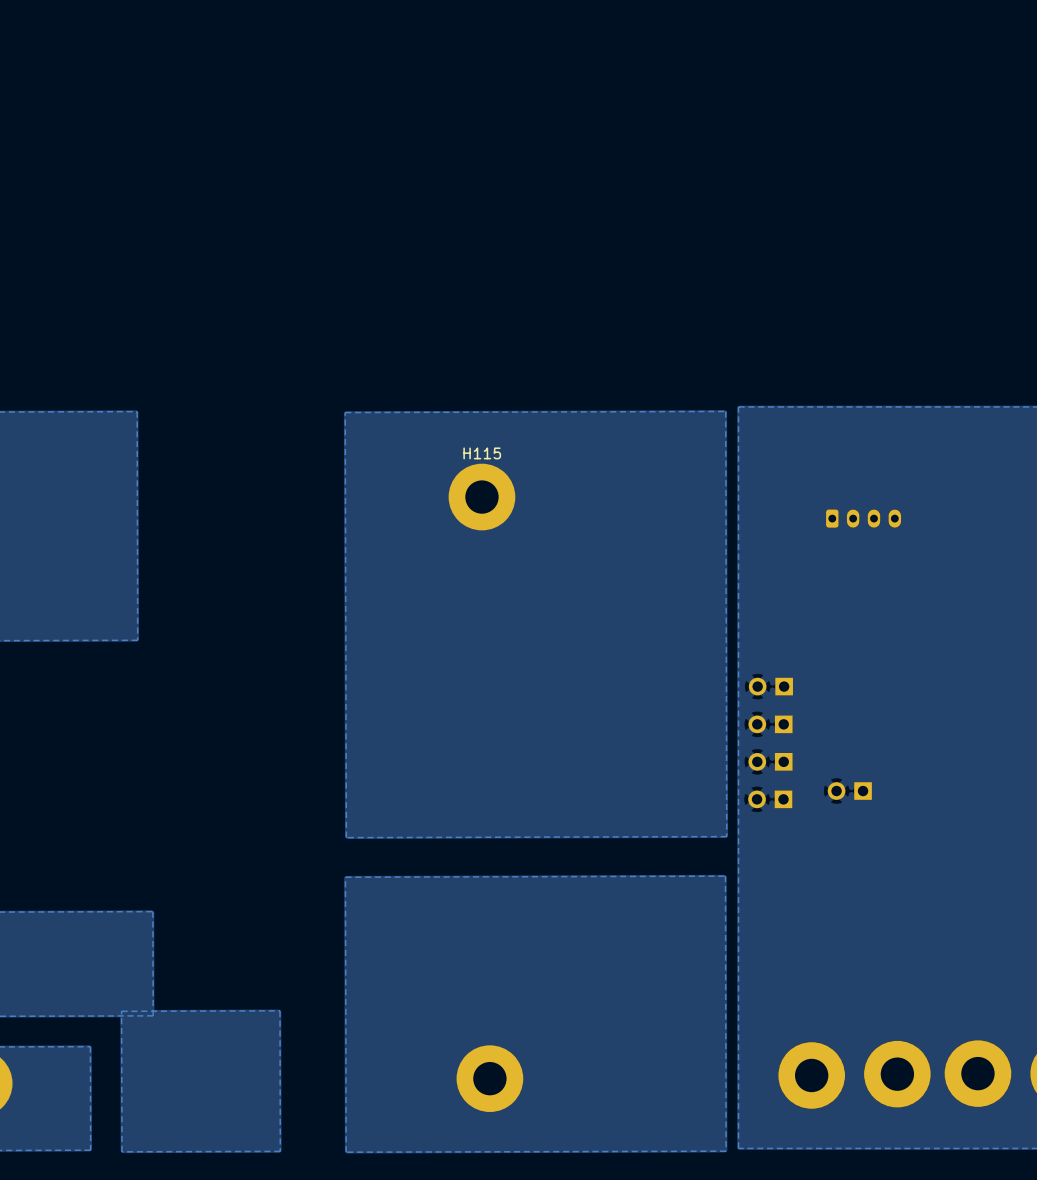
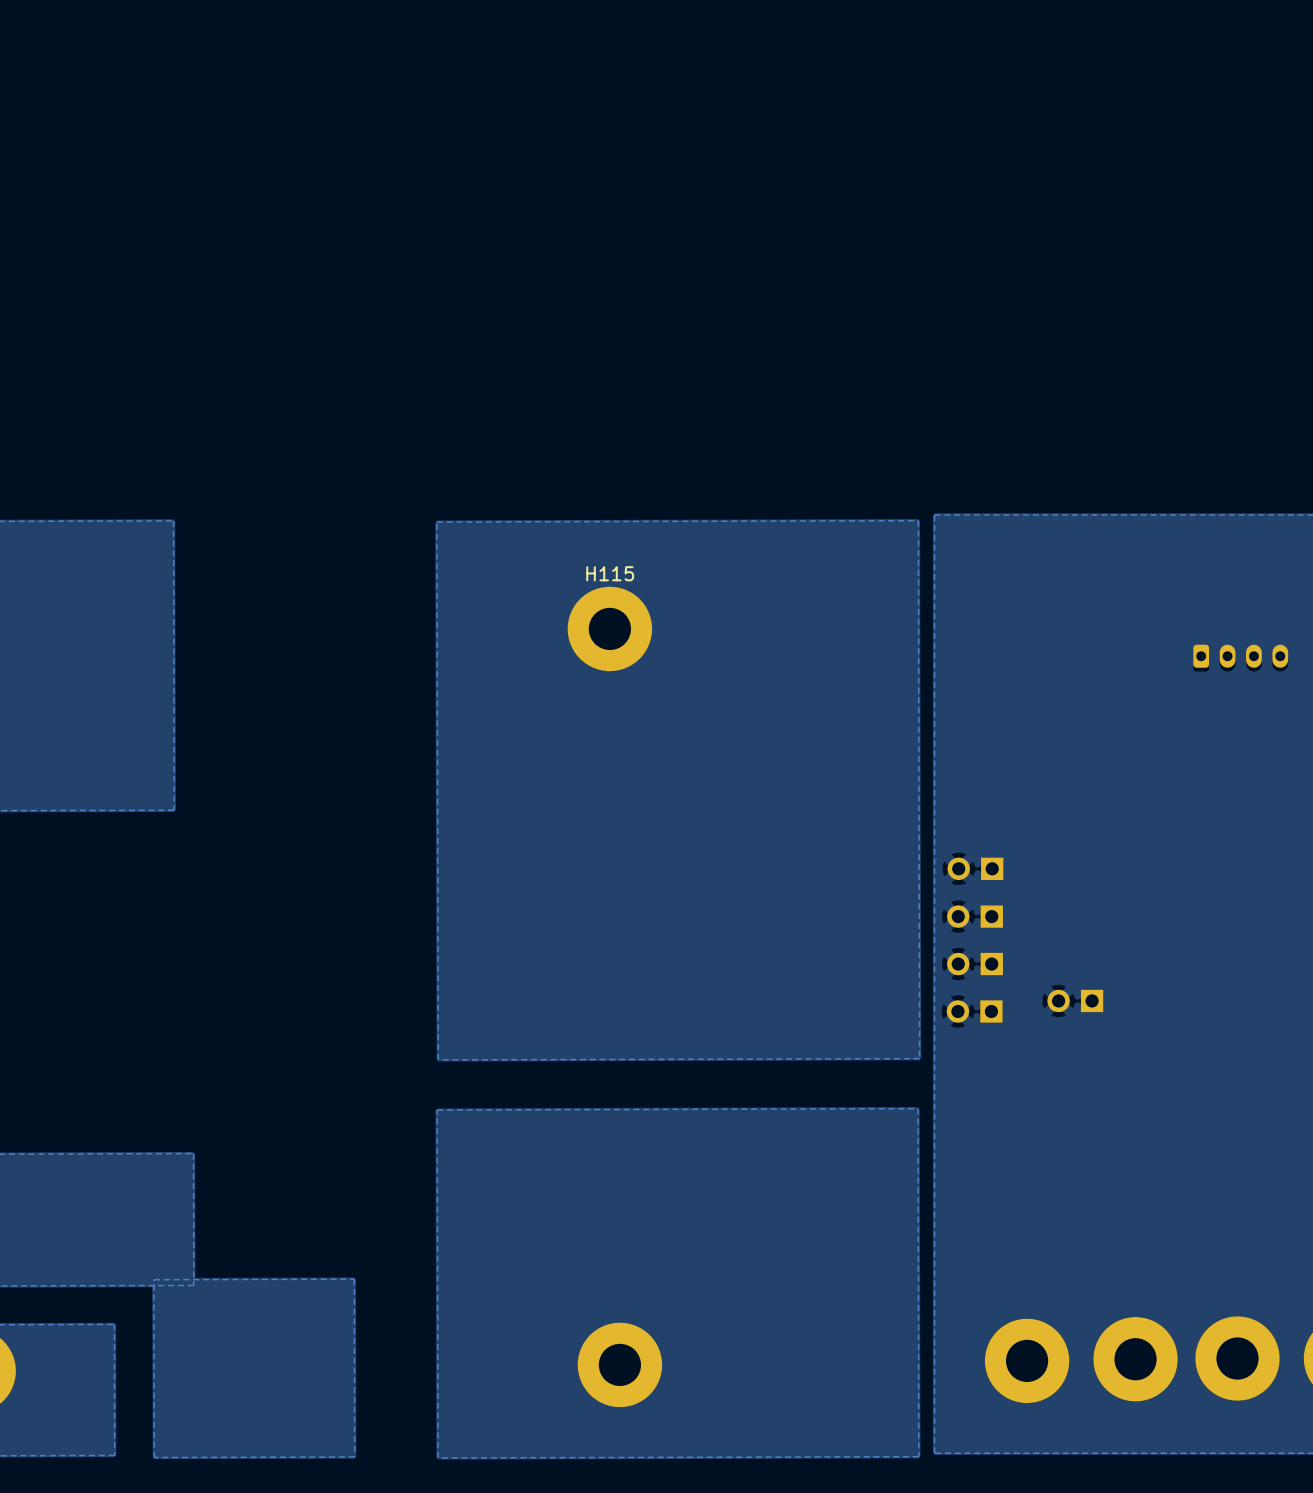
part position: (863, 518) -> (1240, 656)

